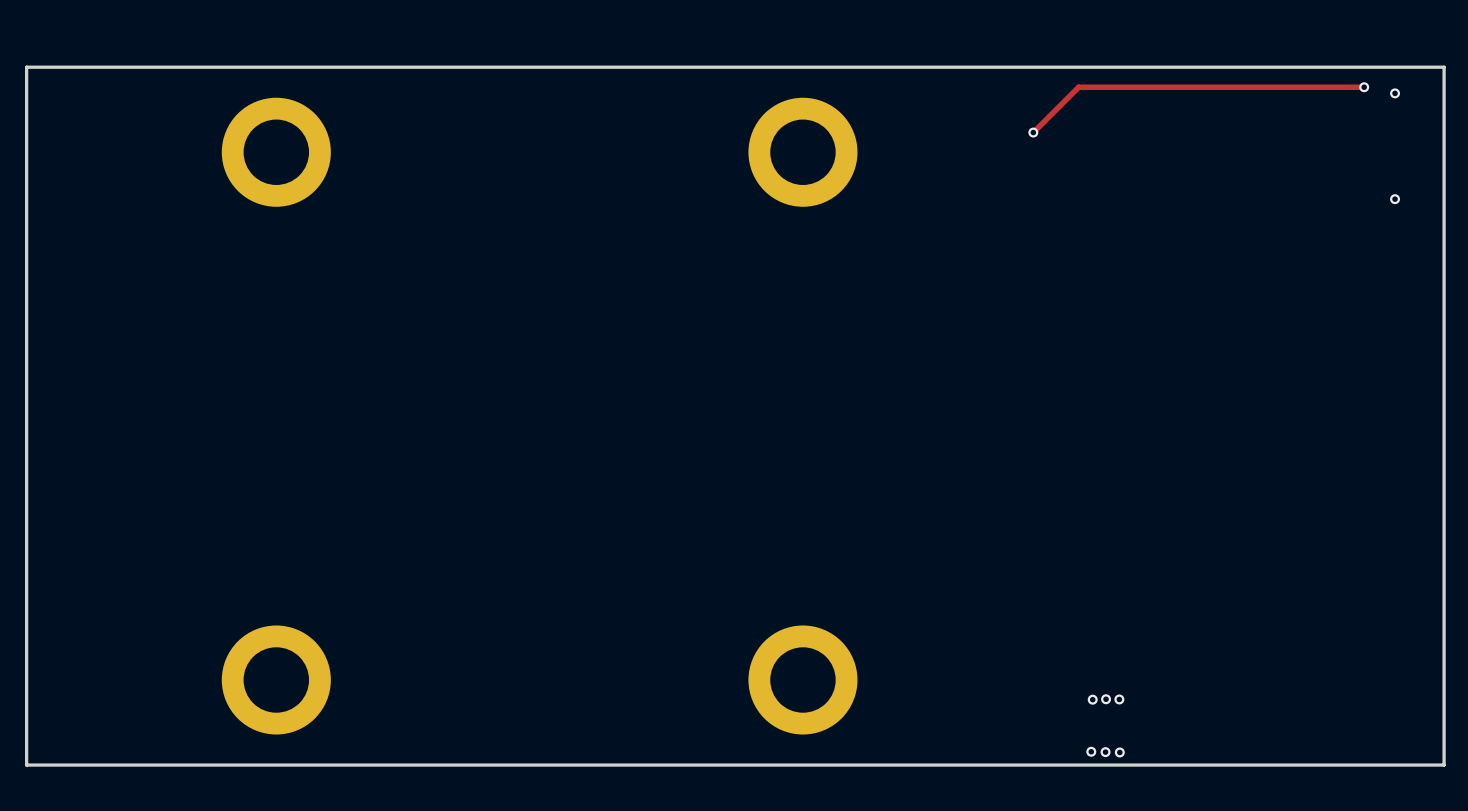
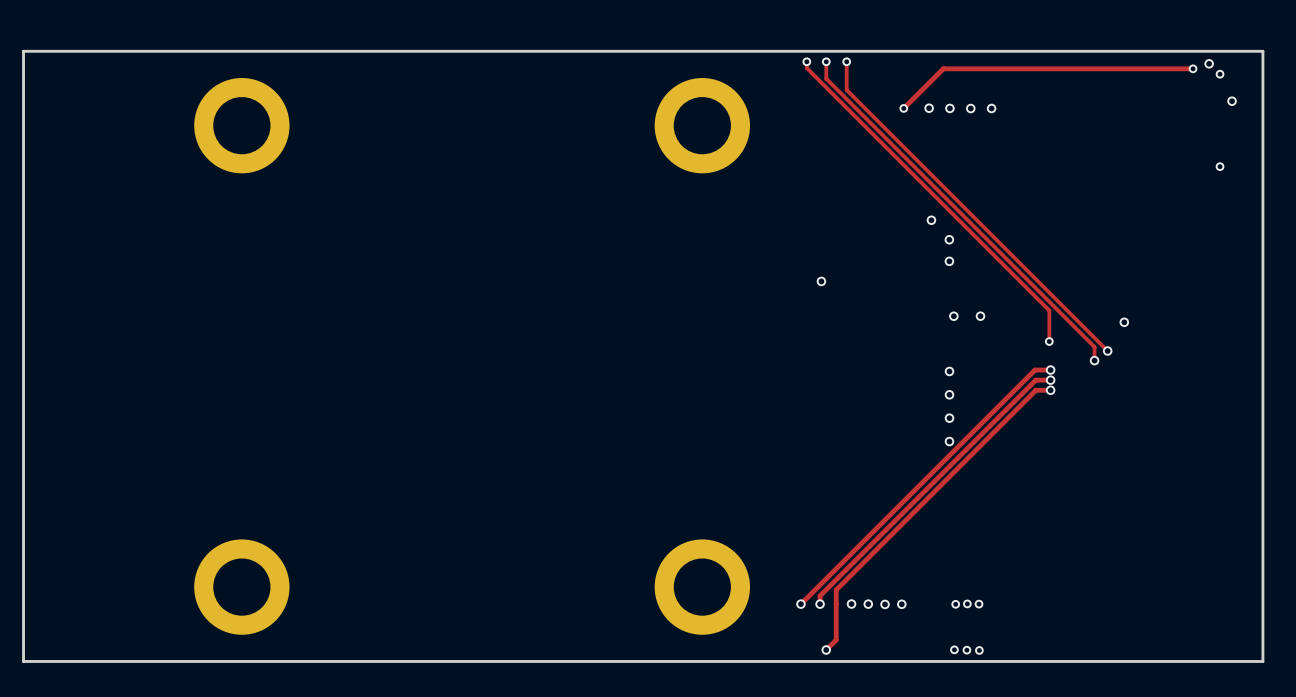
track: none -> (806, 61) (806, 68) (1049, 310) (1049, 341)
via: none -> (806, 61)
track: none -> (826, 61) (826, 78) (1094, 346) (1094, 360)
via: none -> (826, 61)
track: none -> (846, 61) (846, 90) (1107, 351)
via: none -> (846, 61)
via: none -> (1209, 63)
via: none -> (1232, 101)
via: none -> (929, 108)
via: none -> (949, 108)
via: none -> (970, 108)
via: none -> (991, 108)
via: none -> (931, 220)
via: none -> (949, 239)
via: none -> (949, 261)
via: none -> (821, 281)
via: none -> (953, 316)
via: none -> (980, 316)
via: none -> (1124, 322)
via: none -> (1049, 341)
via: none -> (1107, 351)
via: none -> (1094, 360)
track: none -> (1050, 370) (1035, 370) (800, 604)
via: none -> (1050, 370)
via: none -> (949, 371)
track: none -> (1050, 380) (1035, 380) (820, 595) (820, 604)
via: none -> (1050, 380)
track: none -> (1050, 390) (1035, 390) (836, 589) (836, 640) (826, 649)
via: none -> (1050, 390)
via: none -> (949, 394)
via: none -> (949, 418)
via: none -> (949, 441)
via: none -> (800, 604)
via: none -> (820, 604)
via: none -> (851, 604)
via: none -> (868, 604)
via: none -> (885, 604)
via: none -> (901, 604)
via: none -> (826, 649)

